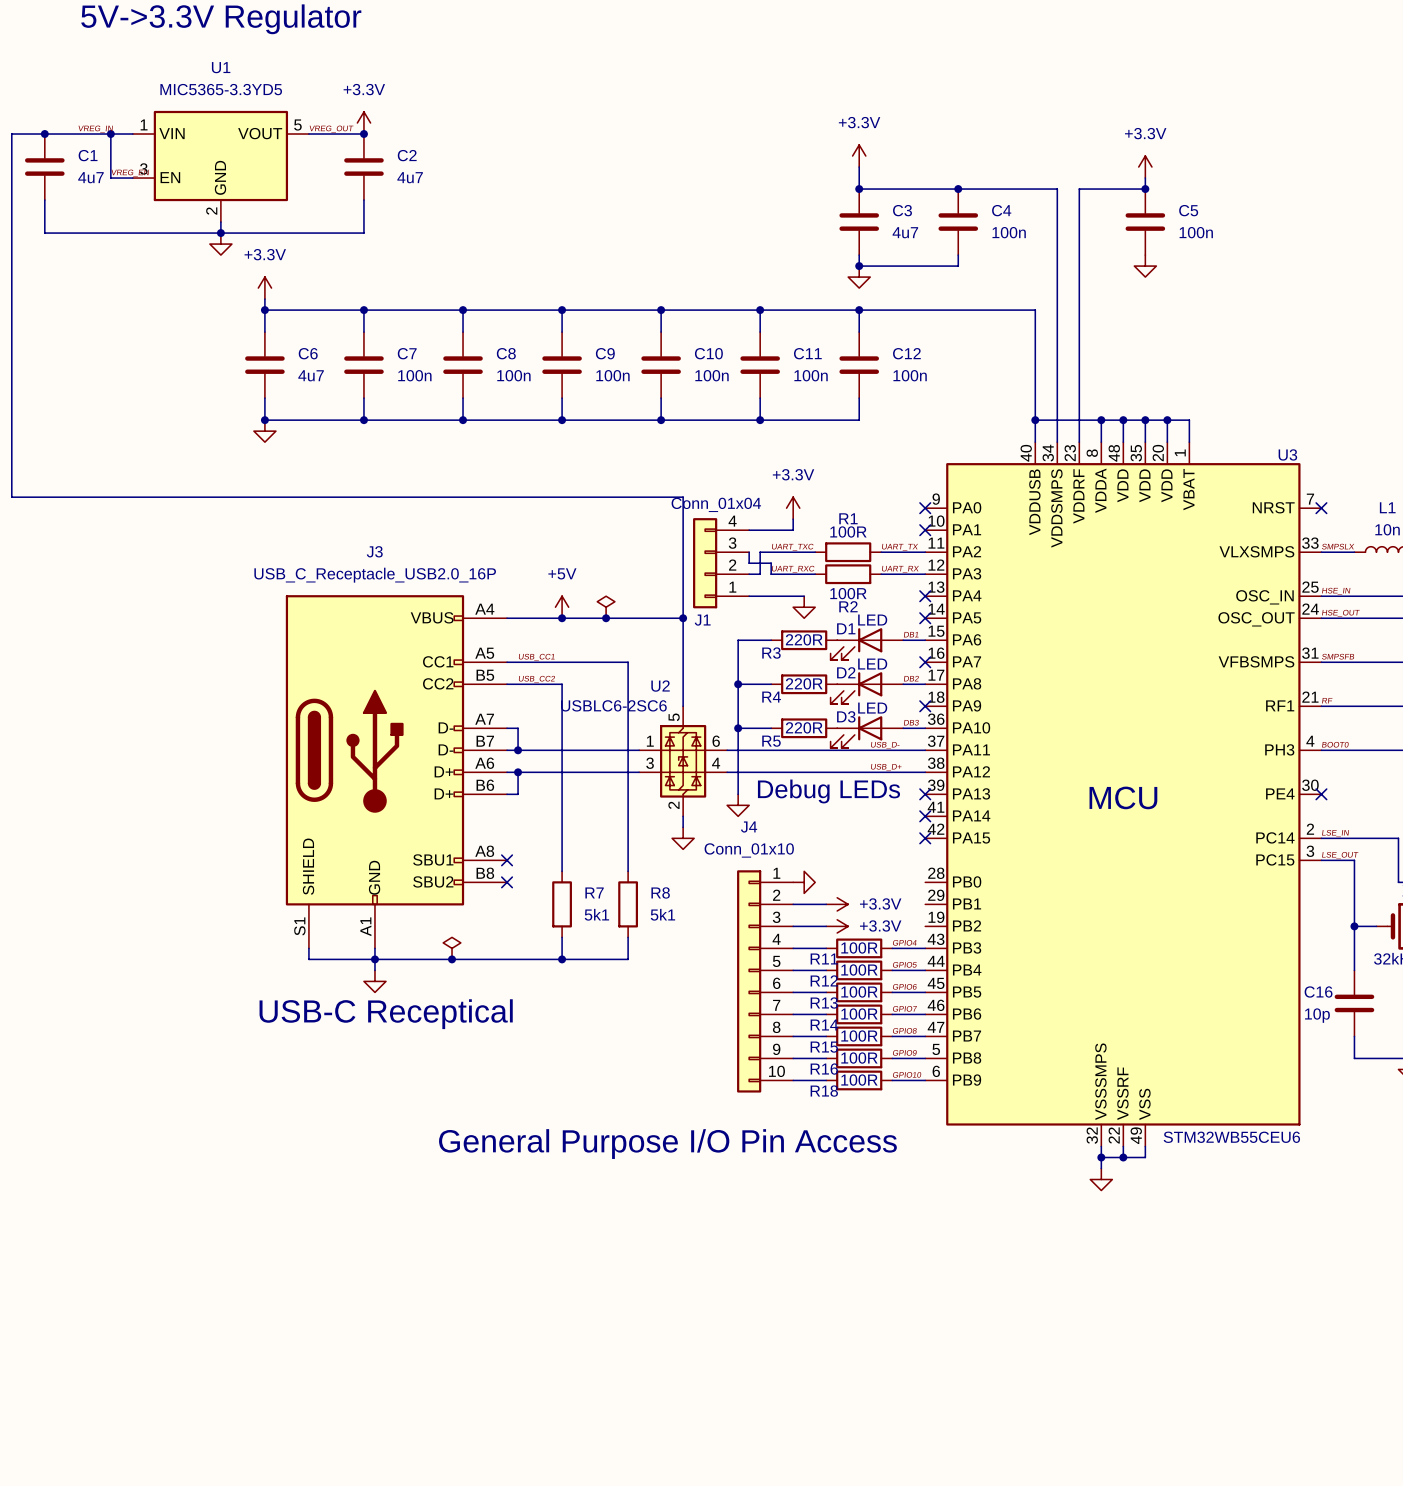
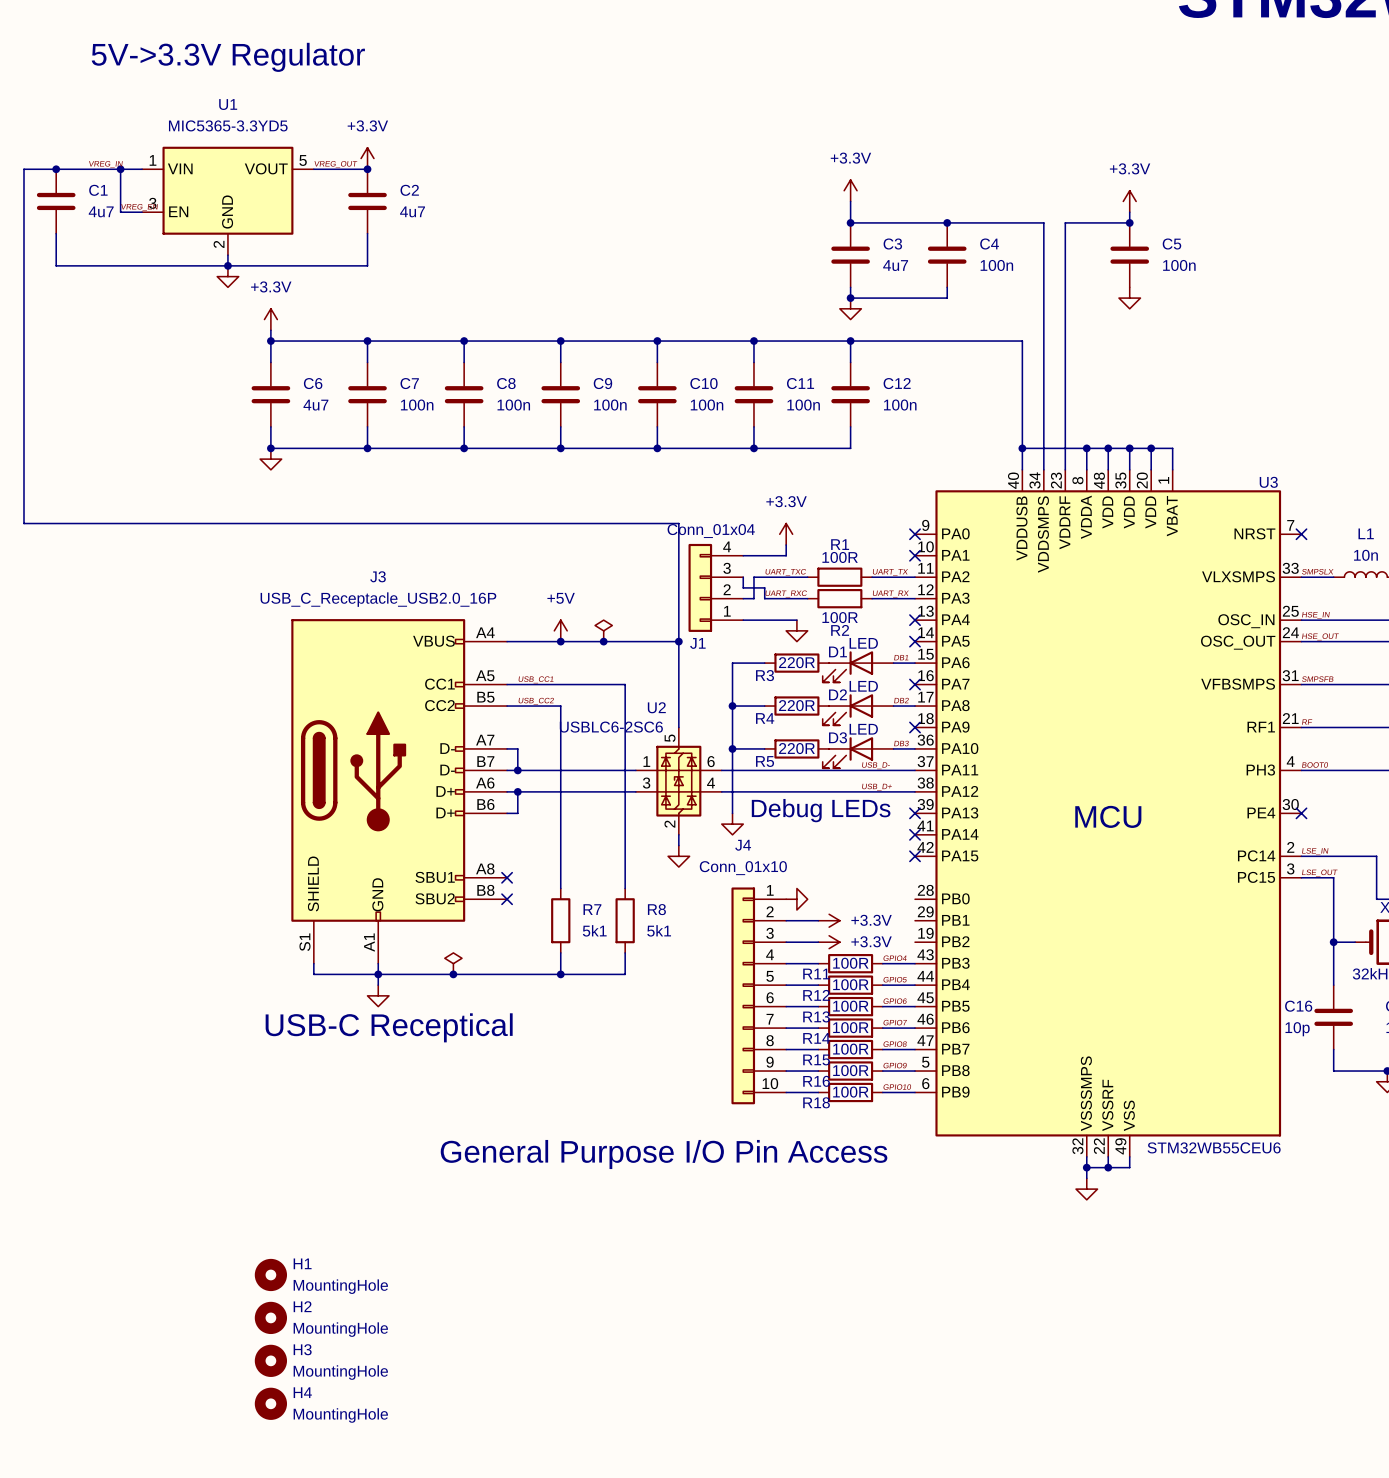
H1: none -> MountingHole (270, 1274)
H2: none -> MountingHole (270, 1317)
H3: none -> MountingHole (270, 1360)
H4: none -> MountingHole (270, 1403)

